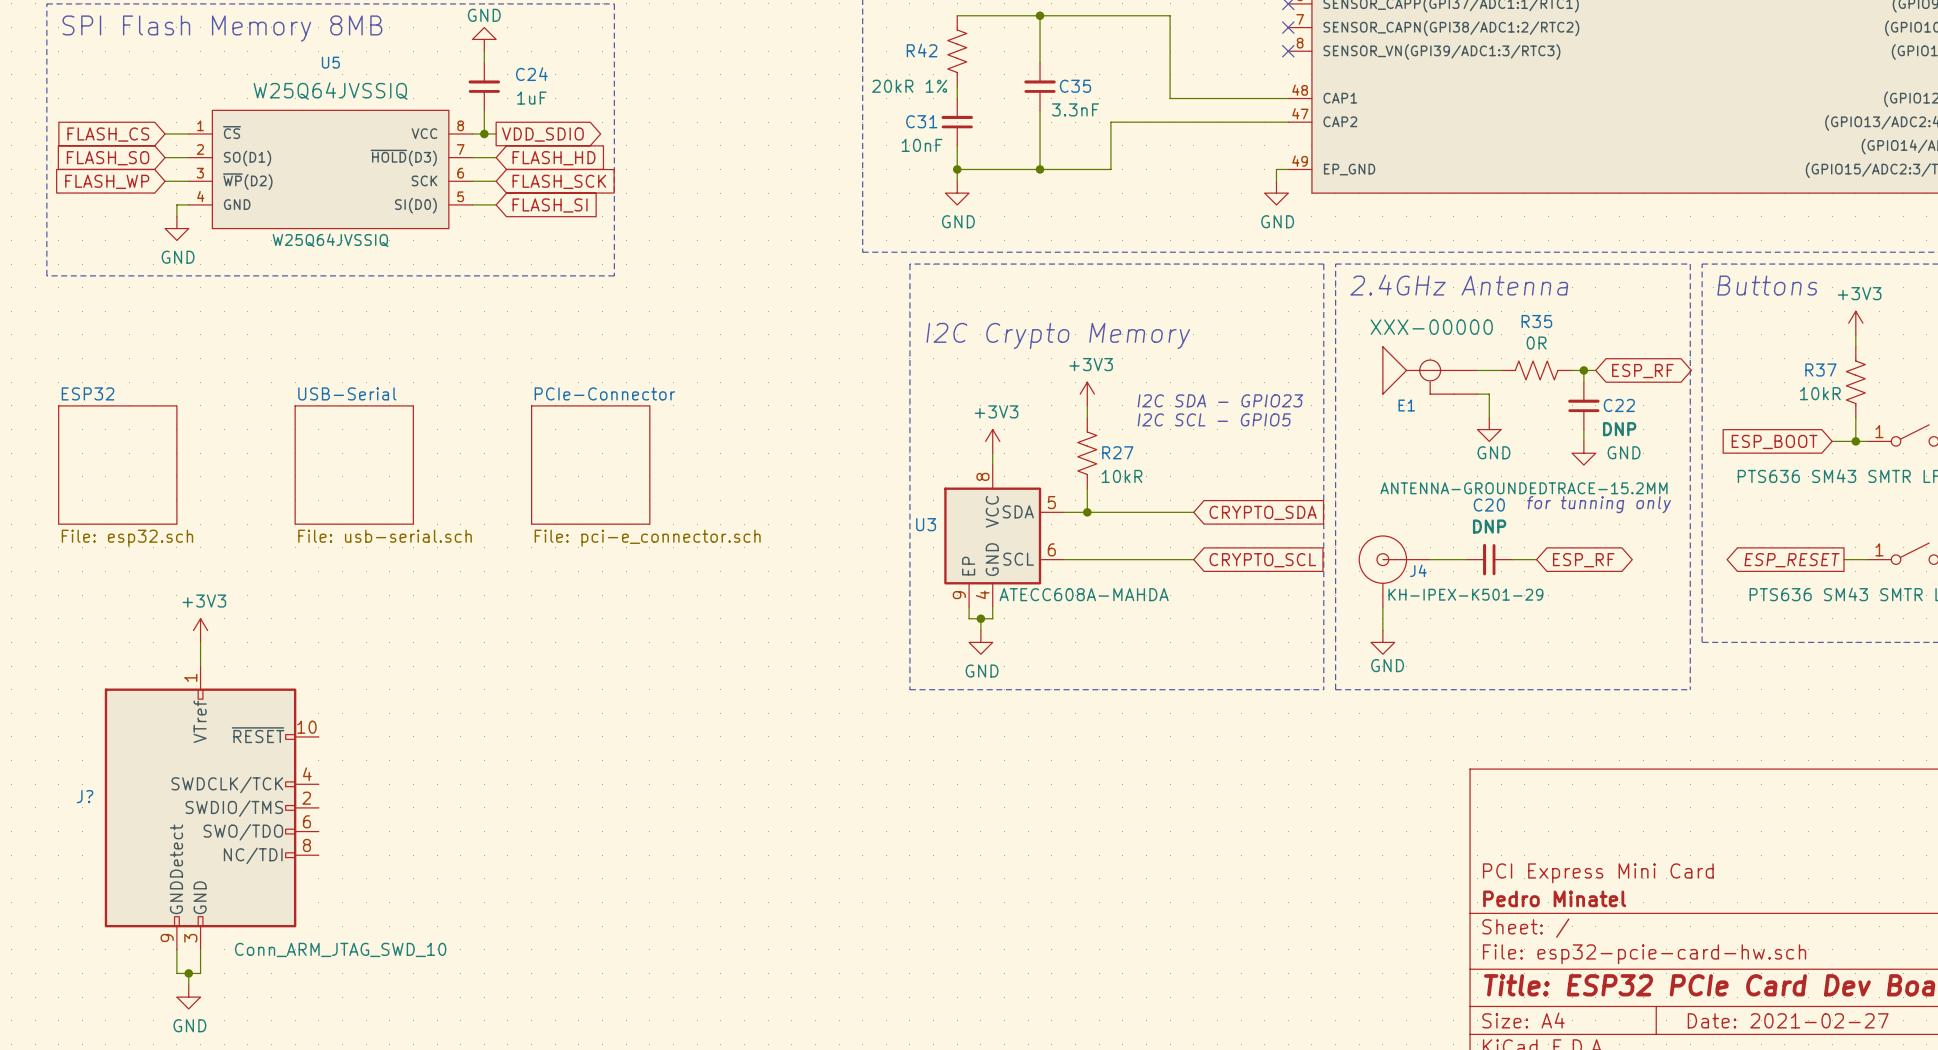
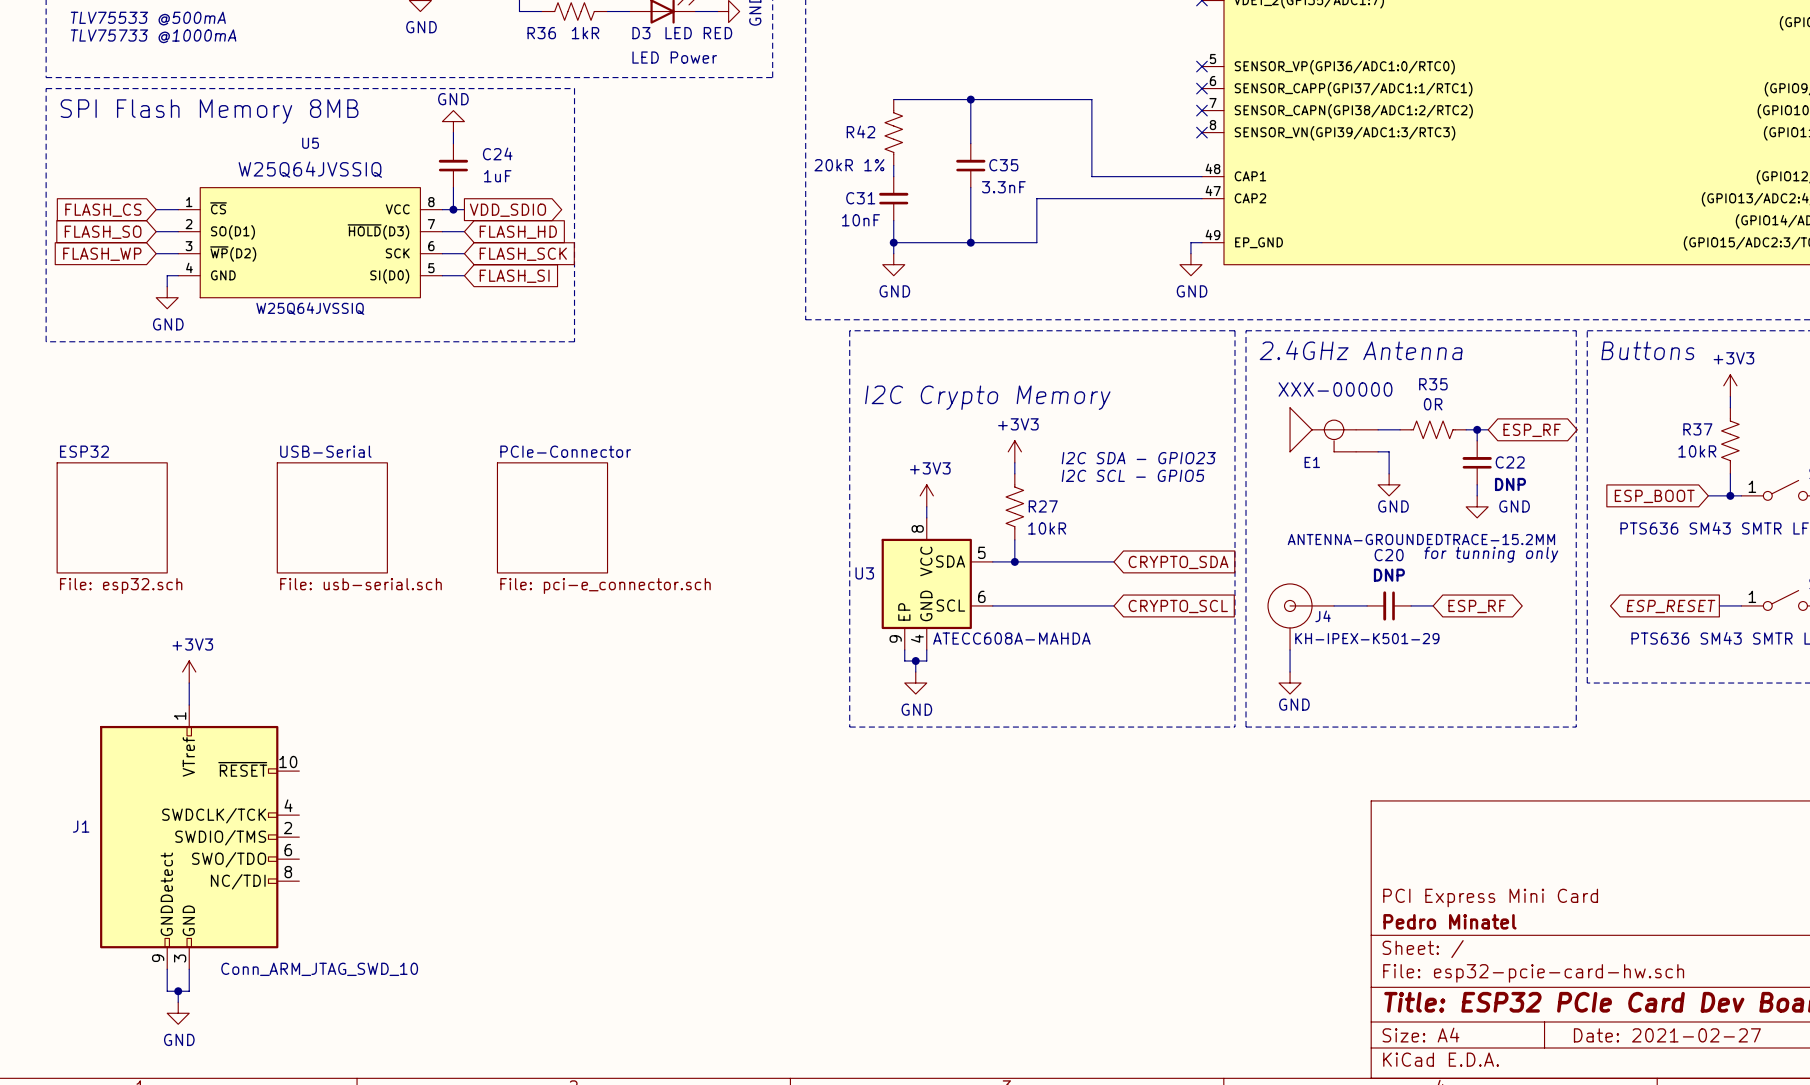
J? name: J? (85, 796) -> J1 (81, 826)

